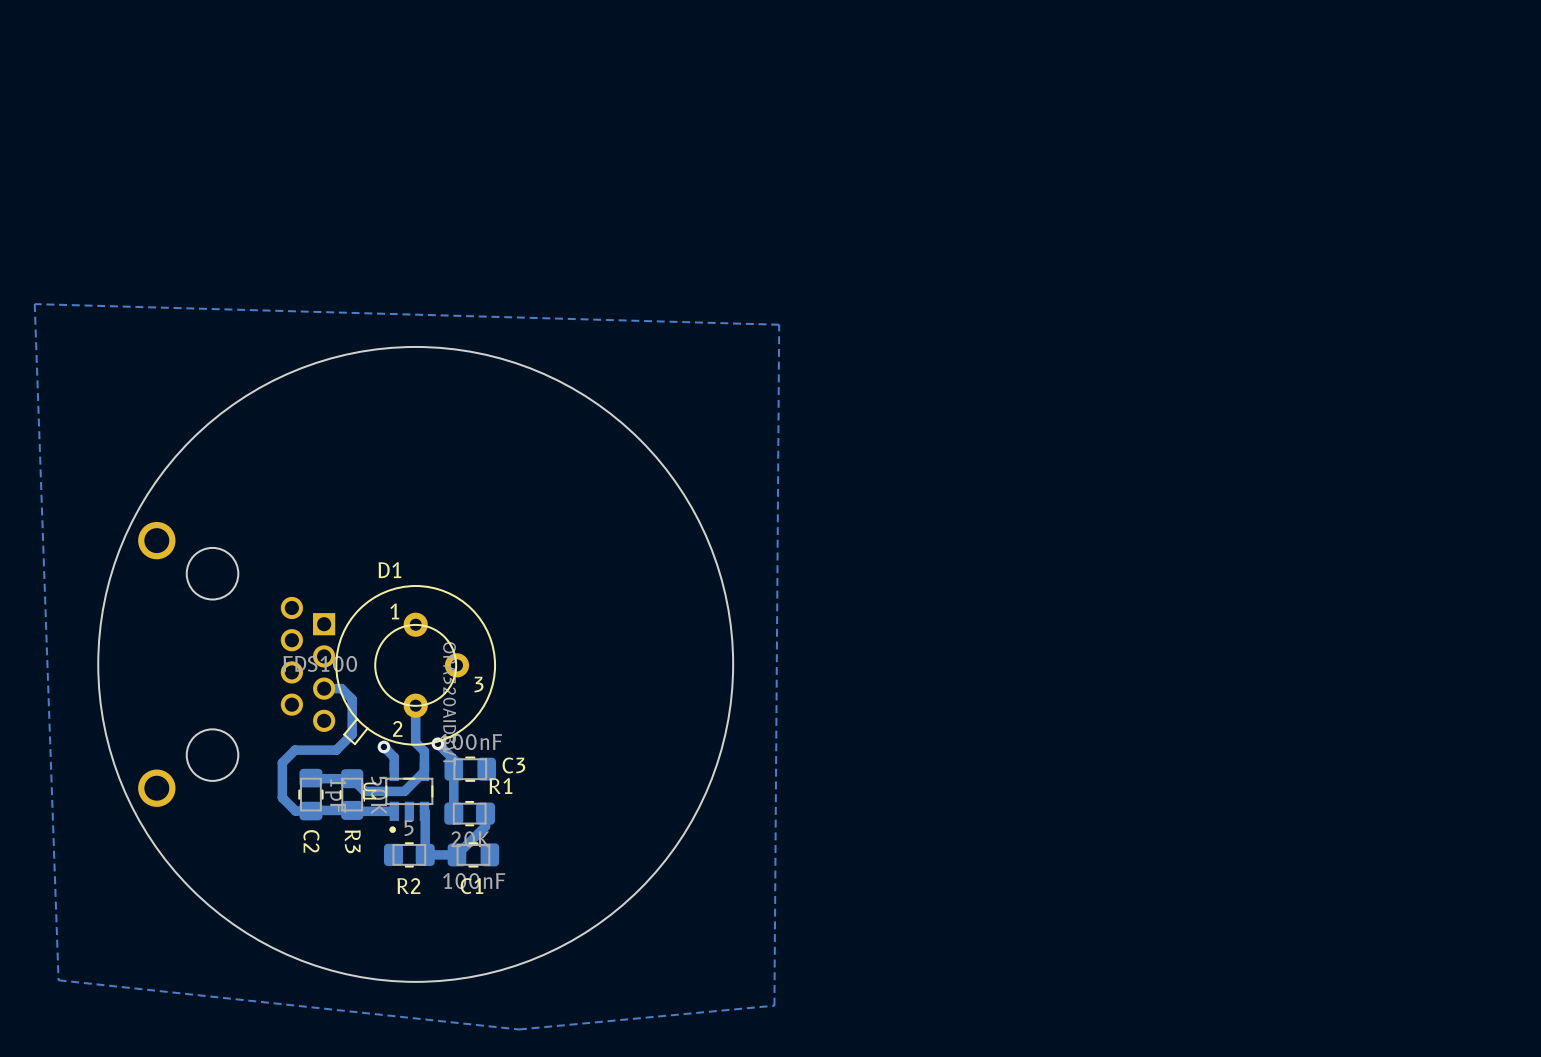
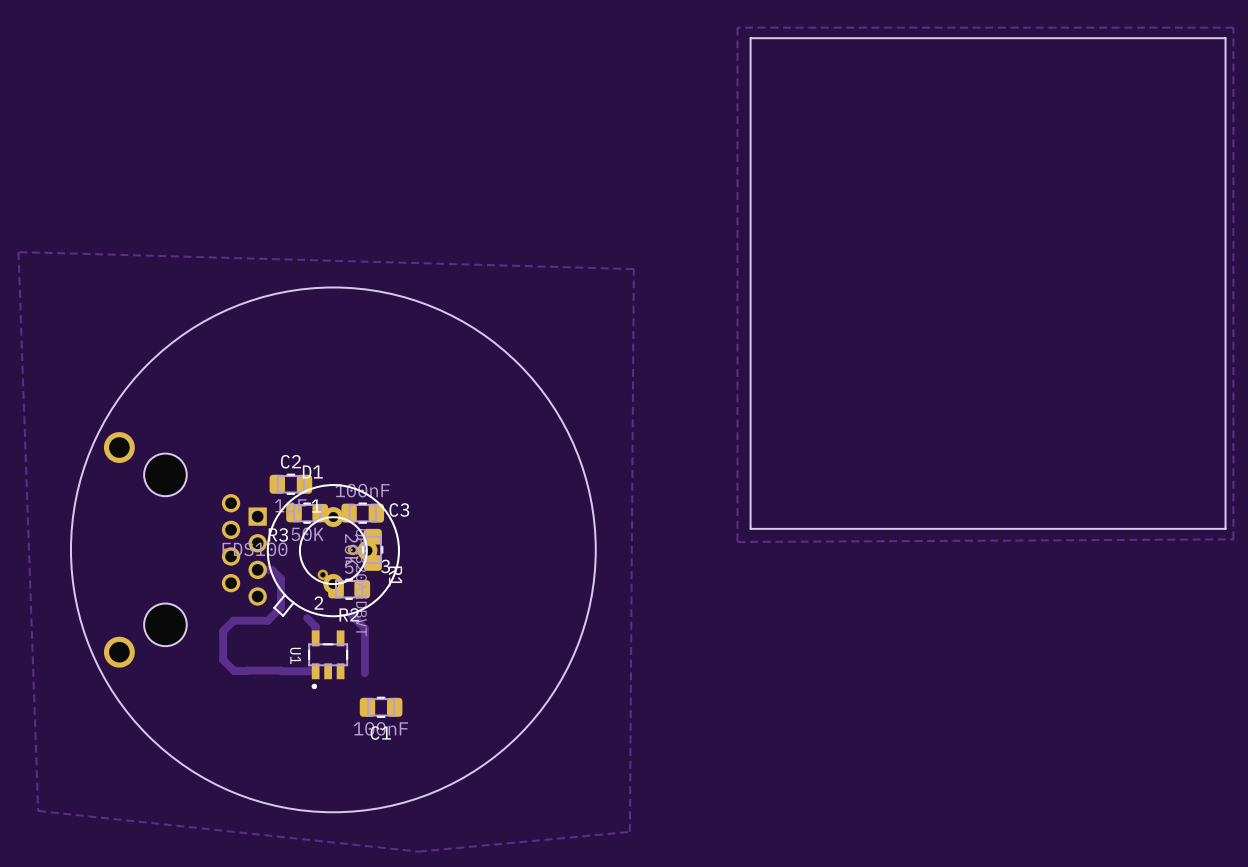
zone outline: none -> (1233, 27) (1233, 539) (737, 541) (737, 27) (1233, 27)
board edge: none -> (1225, 38) (750, 38) (750, 528) (1225, 528) (1225, 38)
via: none -> (353, 549)
via: none -> (322, 574)
track: (415, 705) (415, 742) (424, 751) (424, 771) (404, 791) (364, 791) (352, 778) (310, 778) -> none
via: (437, 743) -> none
via: (383, 746) -> none
C3 position: (470, 769) -> (362, 513)
C2 rotation: 0° (310, 794) -> 90° clockwise (290, 484)
C2 position: (310, 794) -> (290, 484)
R3 rotation: 0° (352, 794) -> 90° clockwise (307, 513)
R3 position: (352, 794) -> (307, 513)
track: (424, 811) (425, 854) (456, 854) (485, 826) (485, 813) -> none
R1 rotation: 0° (469, 813) -> 90° clockwise (372, 549)
R1 position: (469, 813) -> (372, 549)
C2 name position: C2 (311, 841) -> C2 (290, 461)
R2 position: (409, 854) -> (349, 589)

